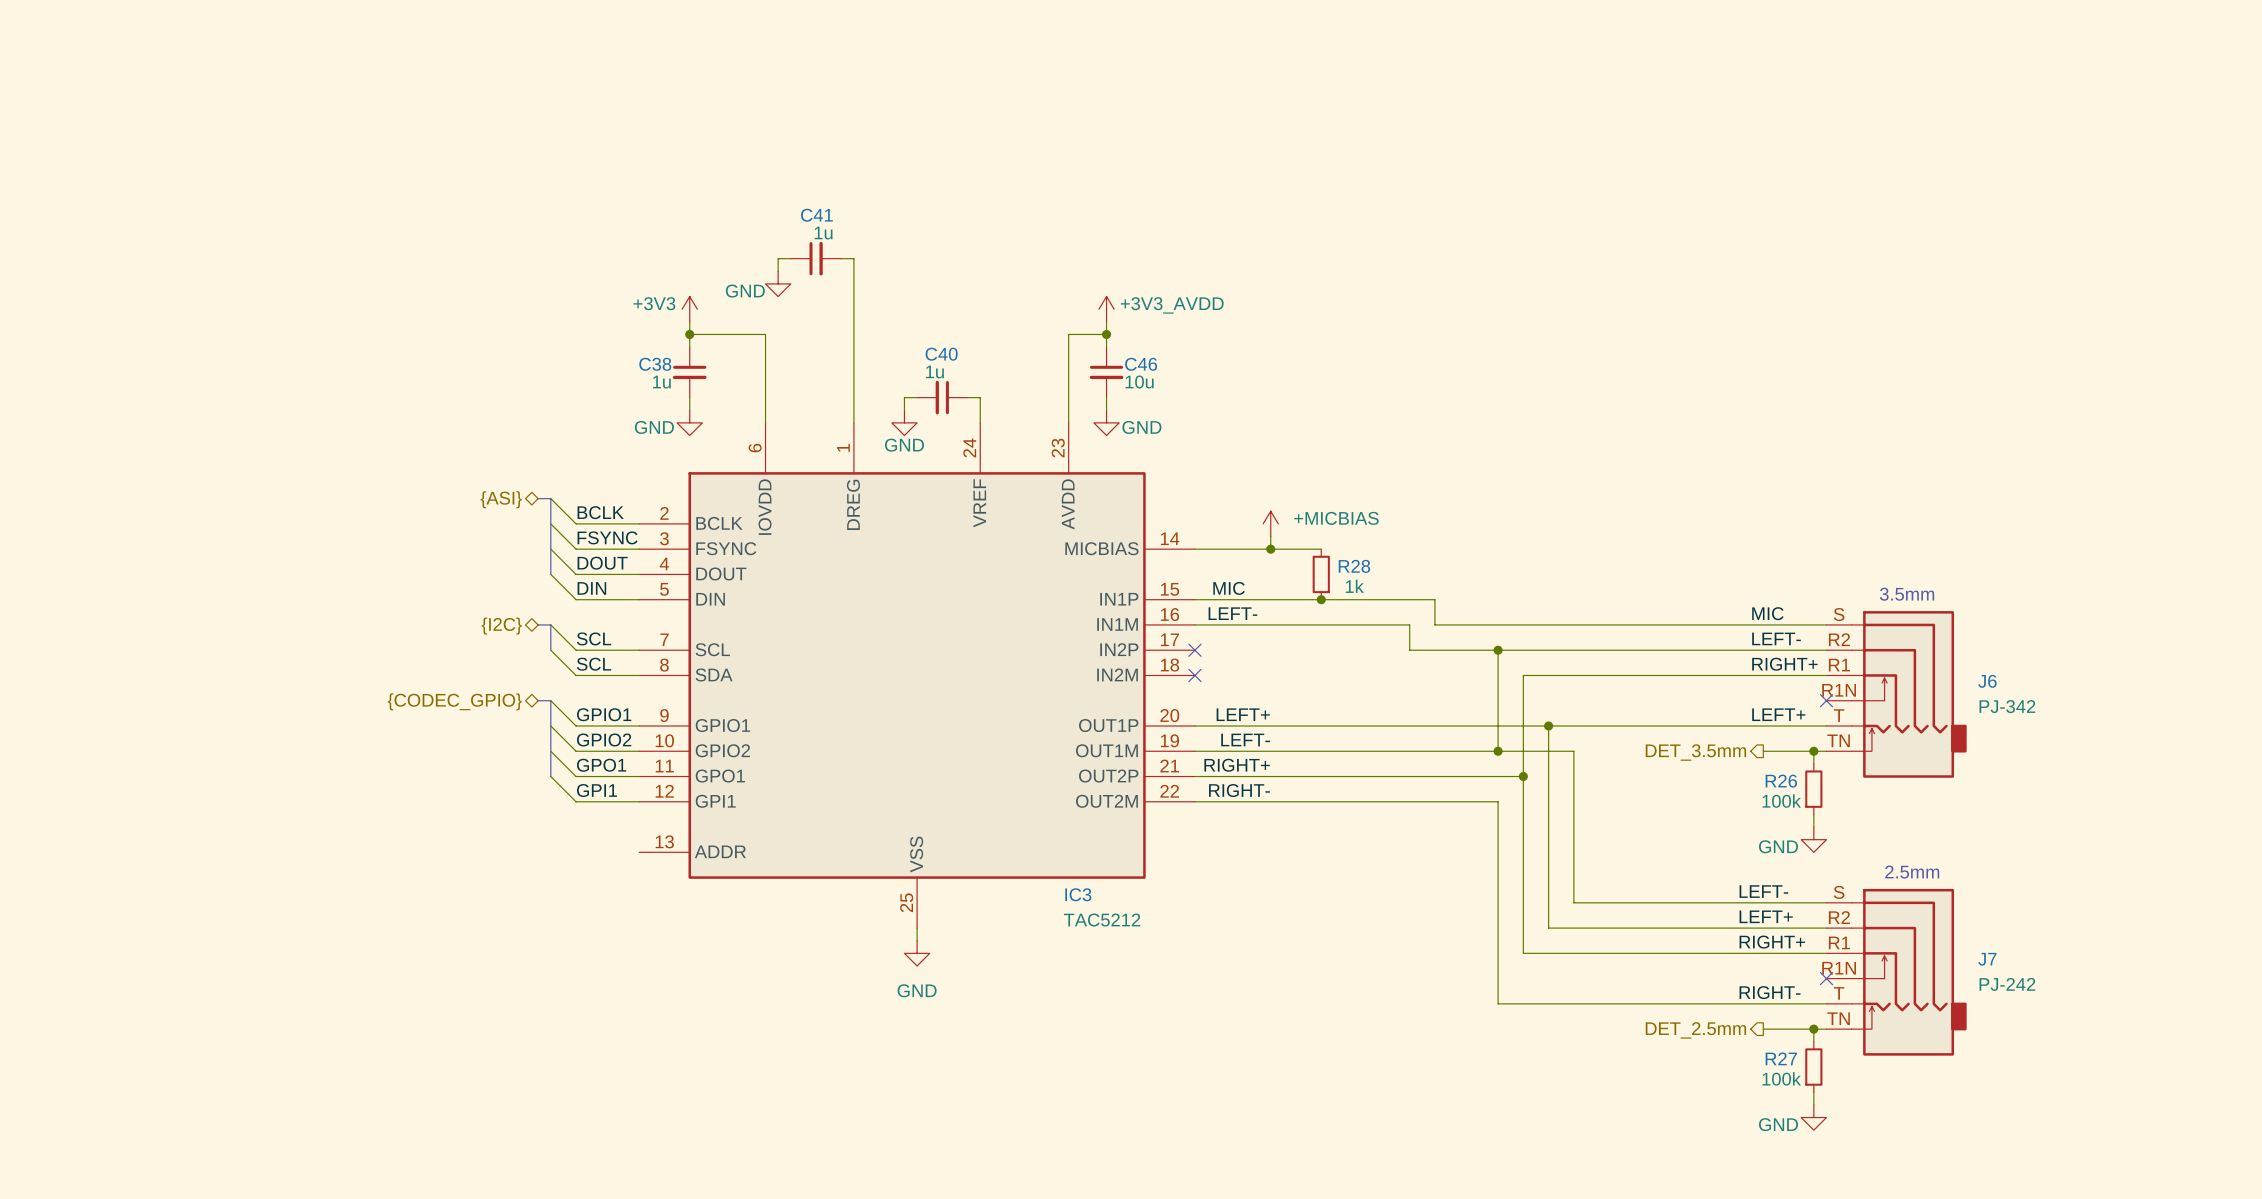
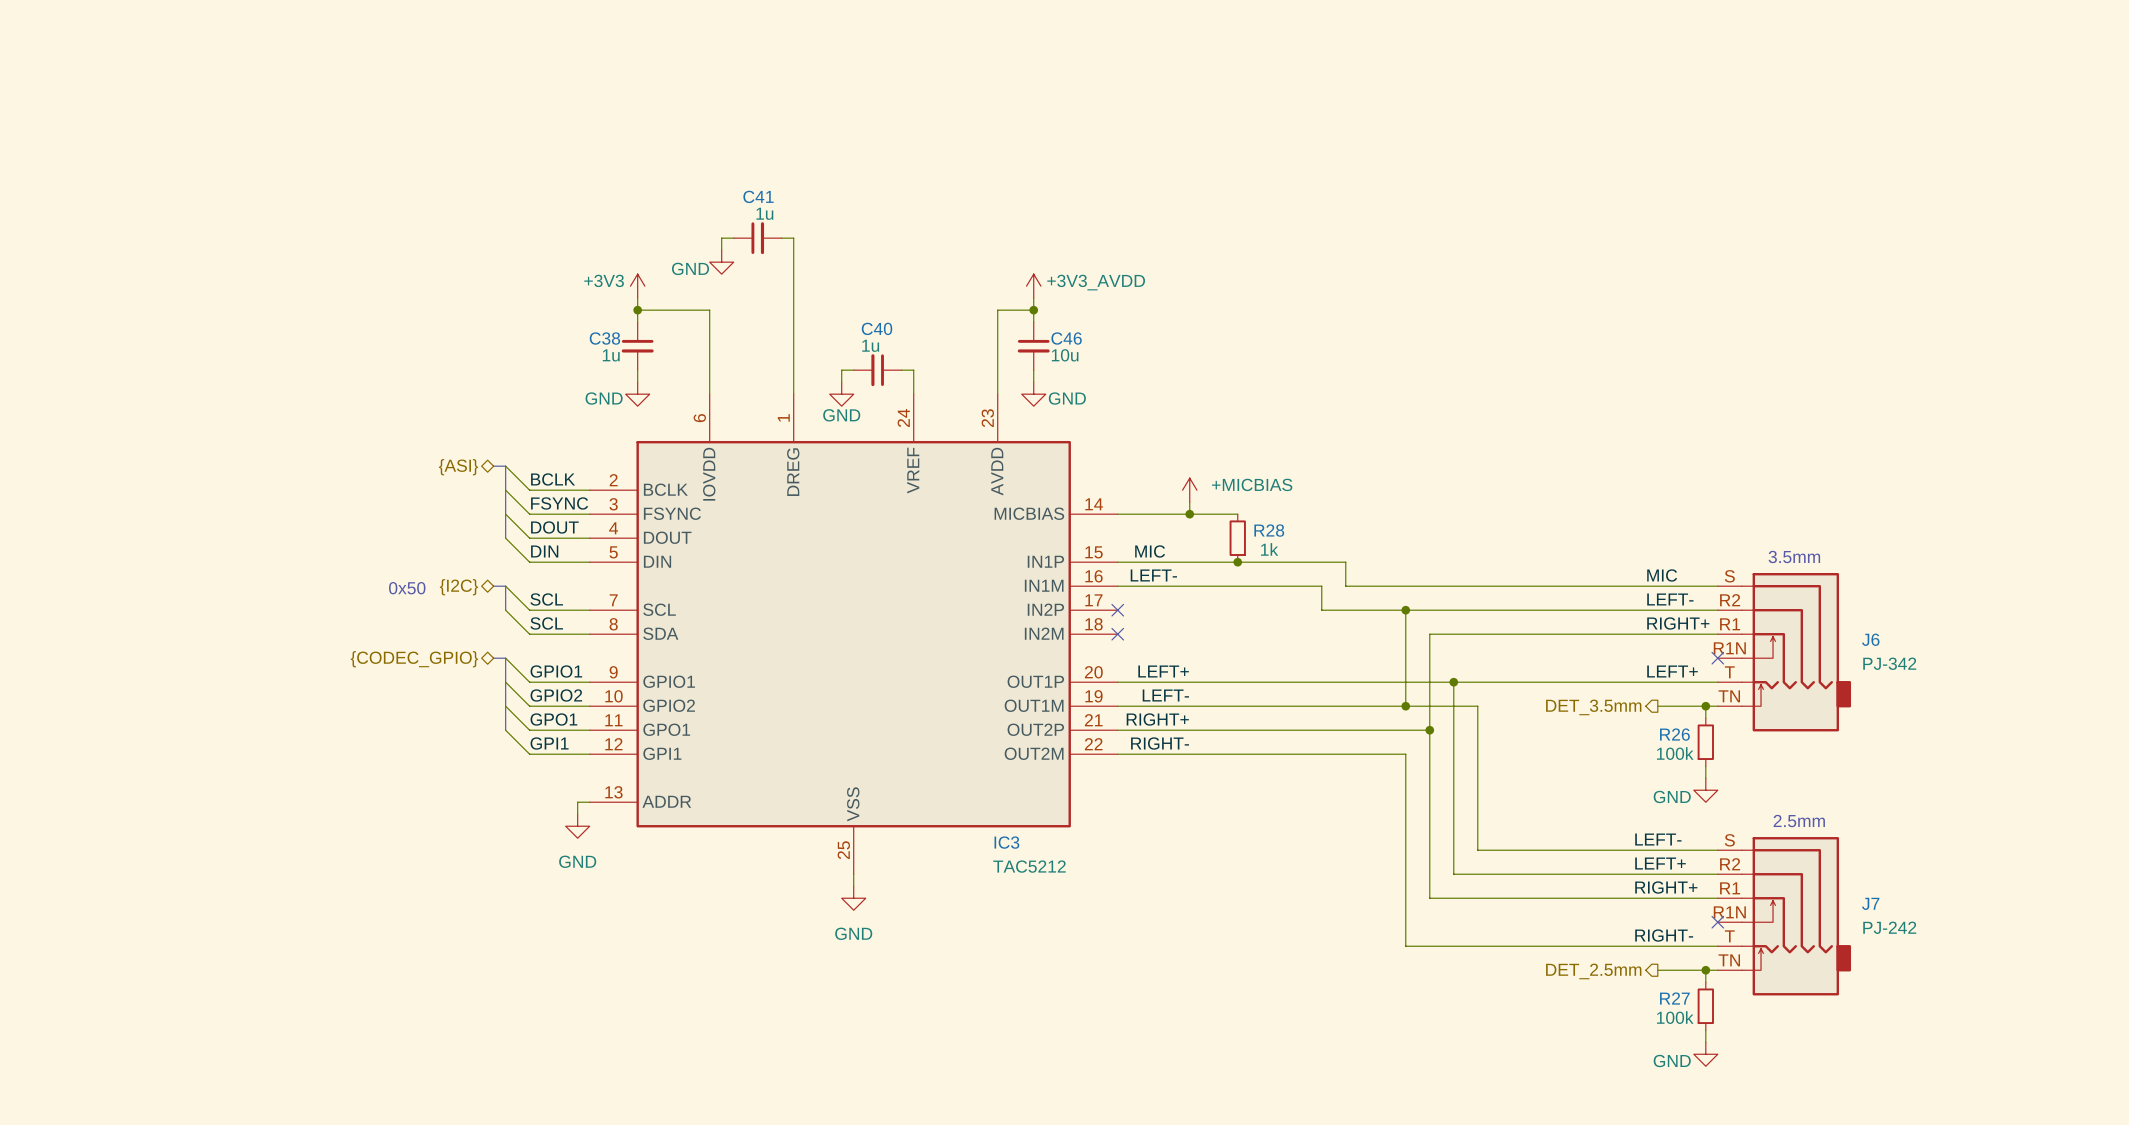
text: none -> 0x50 (407, 588)
wire: none -> (589, 802) (577, 802) (577, 814)
power symbol: none -> GND (577, 826)

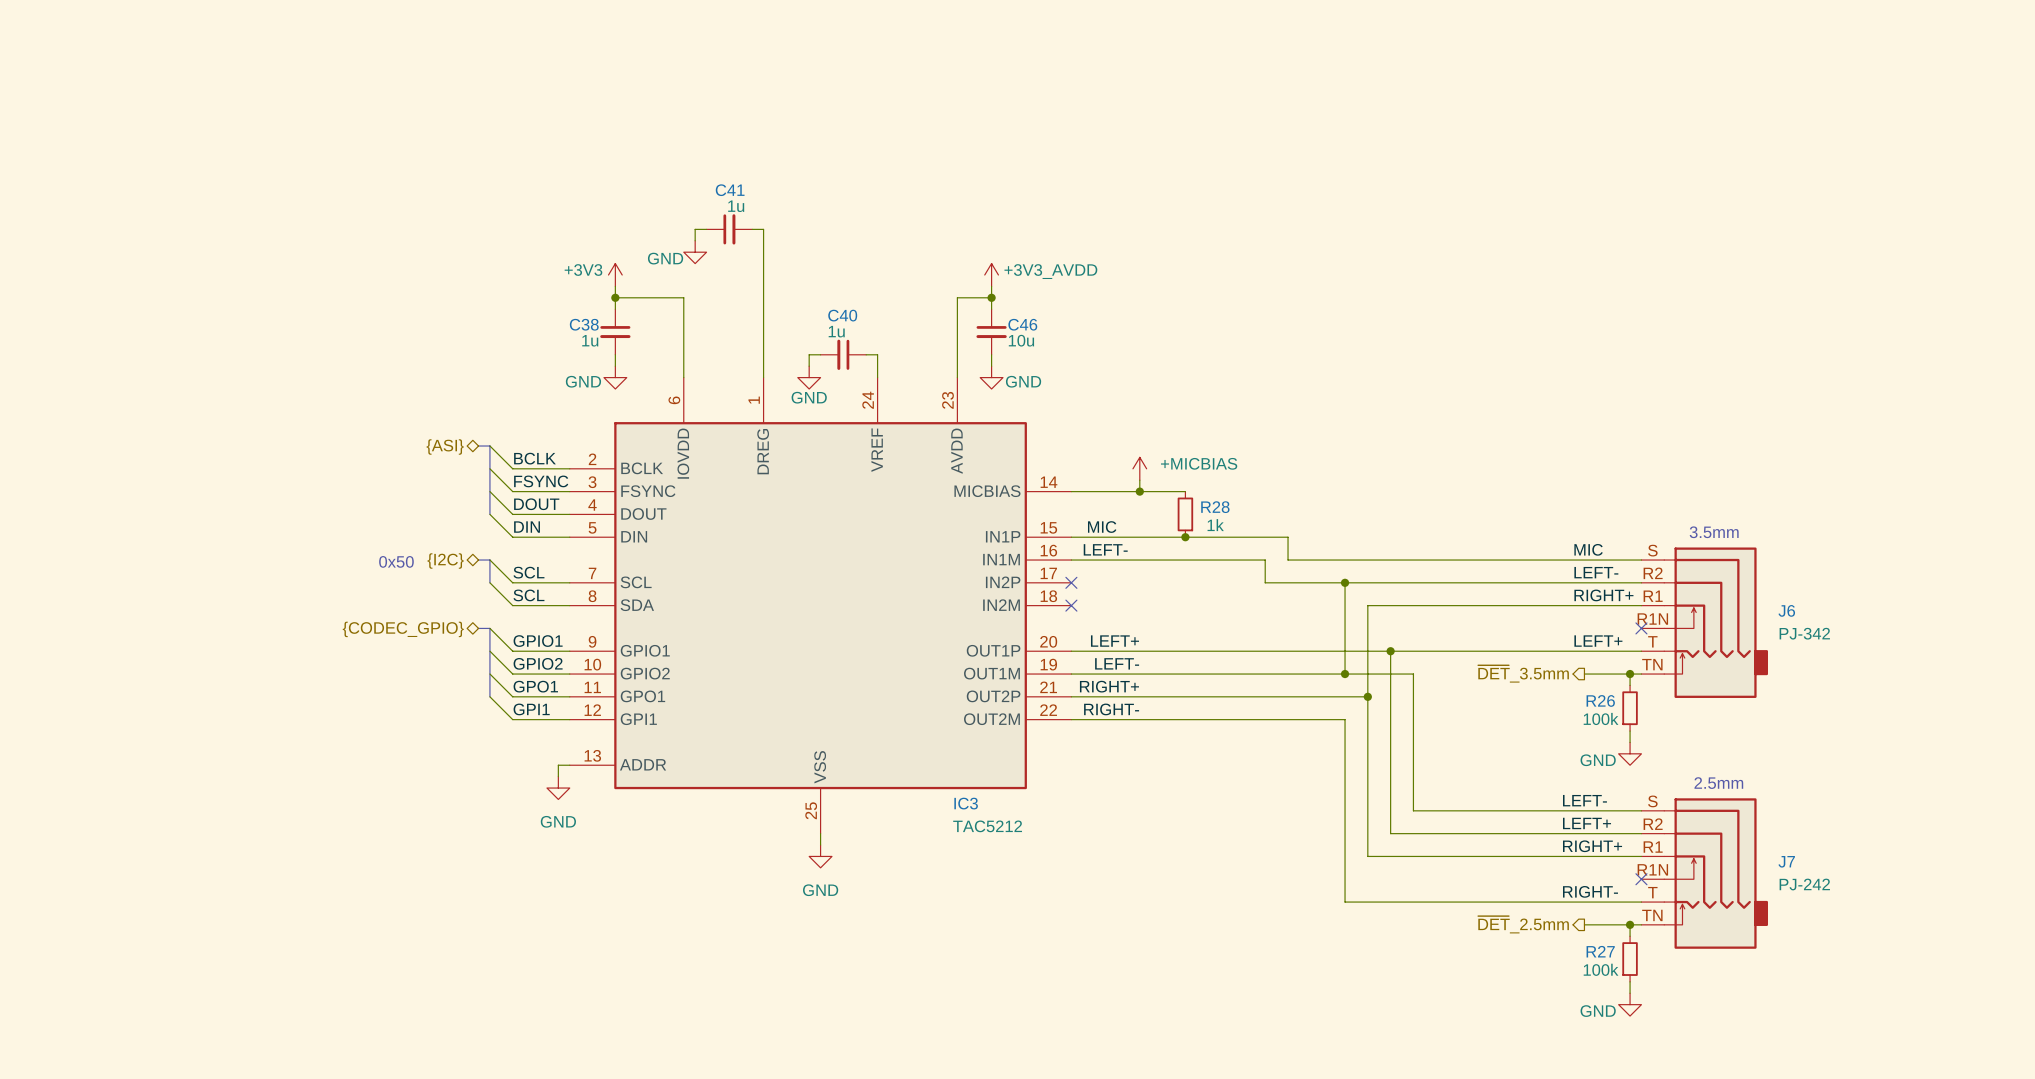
hierarchical label: DET_3.5mm (1593, 707) -> ~{DET}_3.5mm (1523, 673)
hierarchical label: DET_2.5mm (1593, 971) -> ~{DET}_2.5mm (1523, 924)

